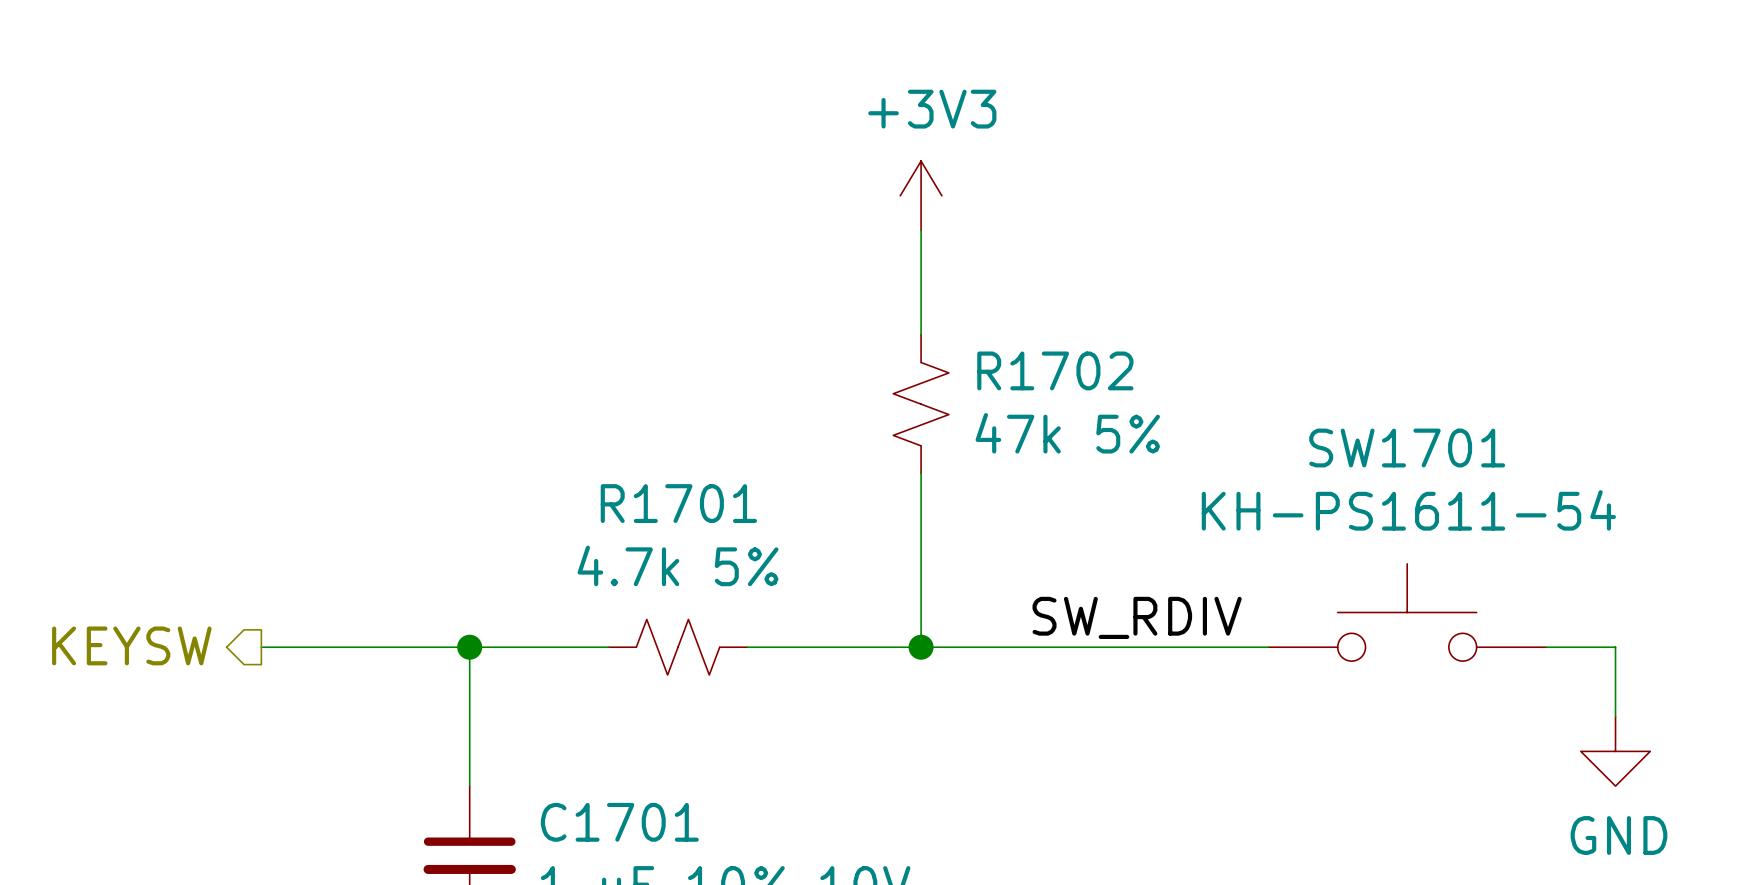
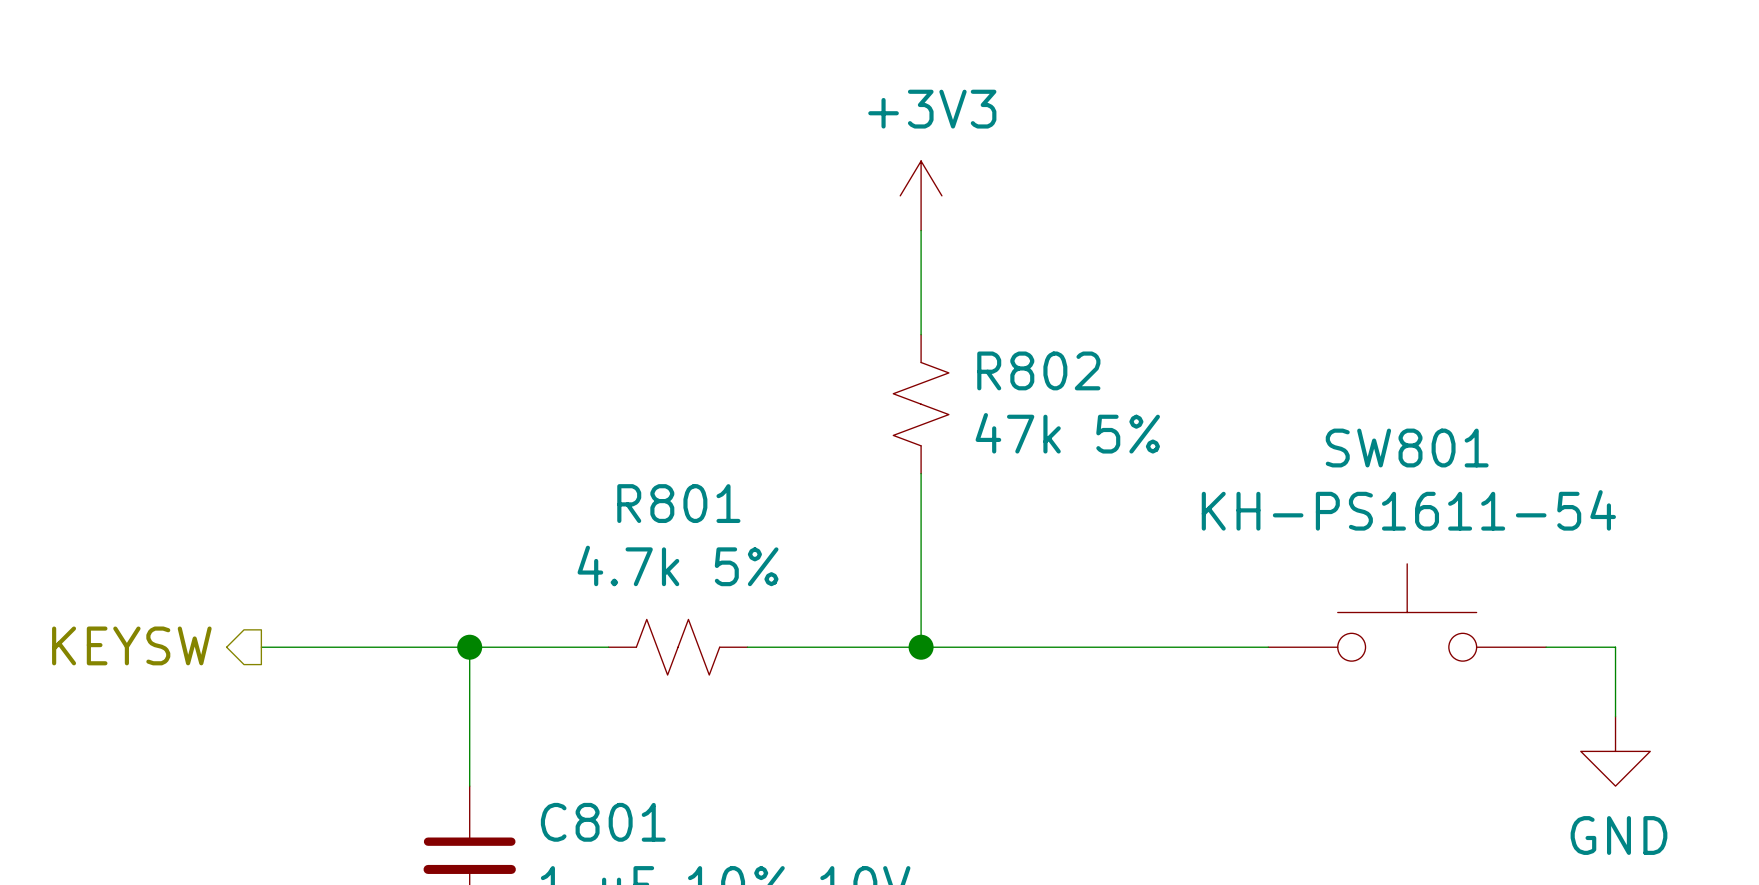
R1702 name: R1702 (1055, 370) -> R802 (1038, 370)
SW1701 name: SW1701 (1407, 448) -> SW801 (1407, 448)
R1701 name: R1701 (678, 503) -> R801 (678, 503)
label: SW_RDIV (1137, 617) -> none
C1701 name: C1701 (619, 822) -> C801 (603, 822)

